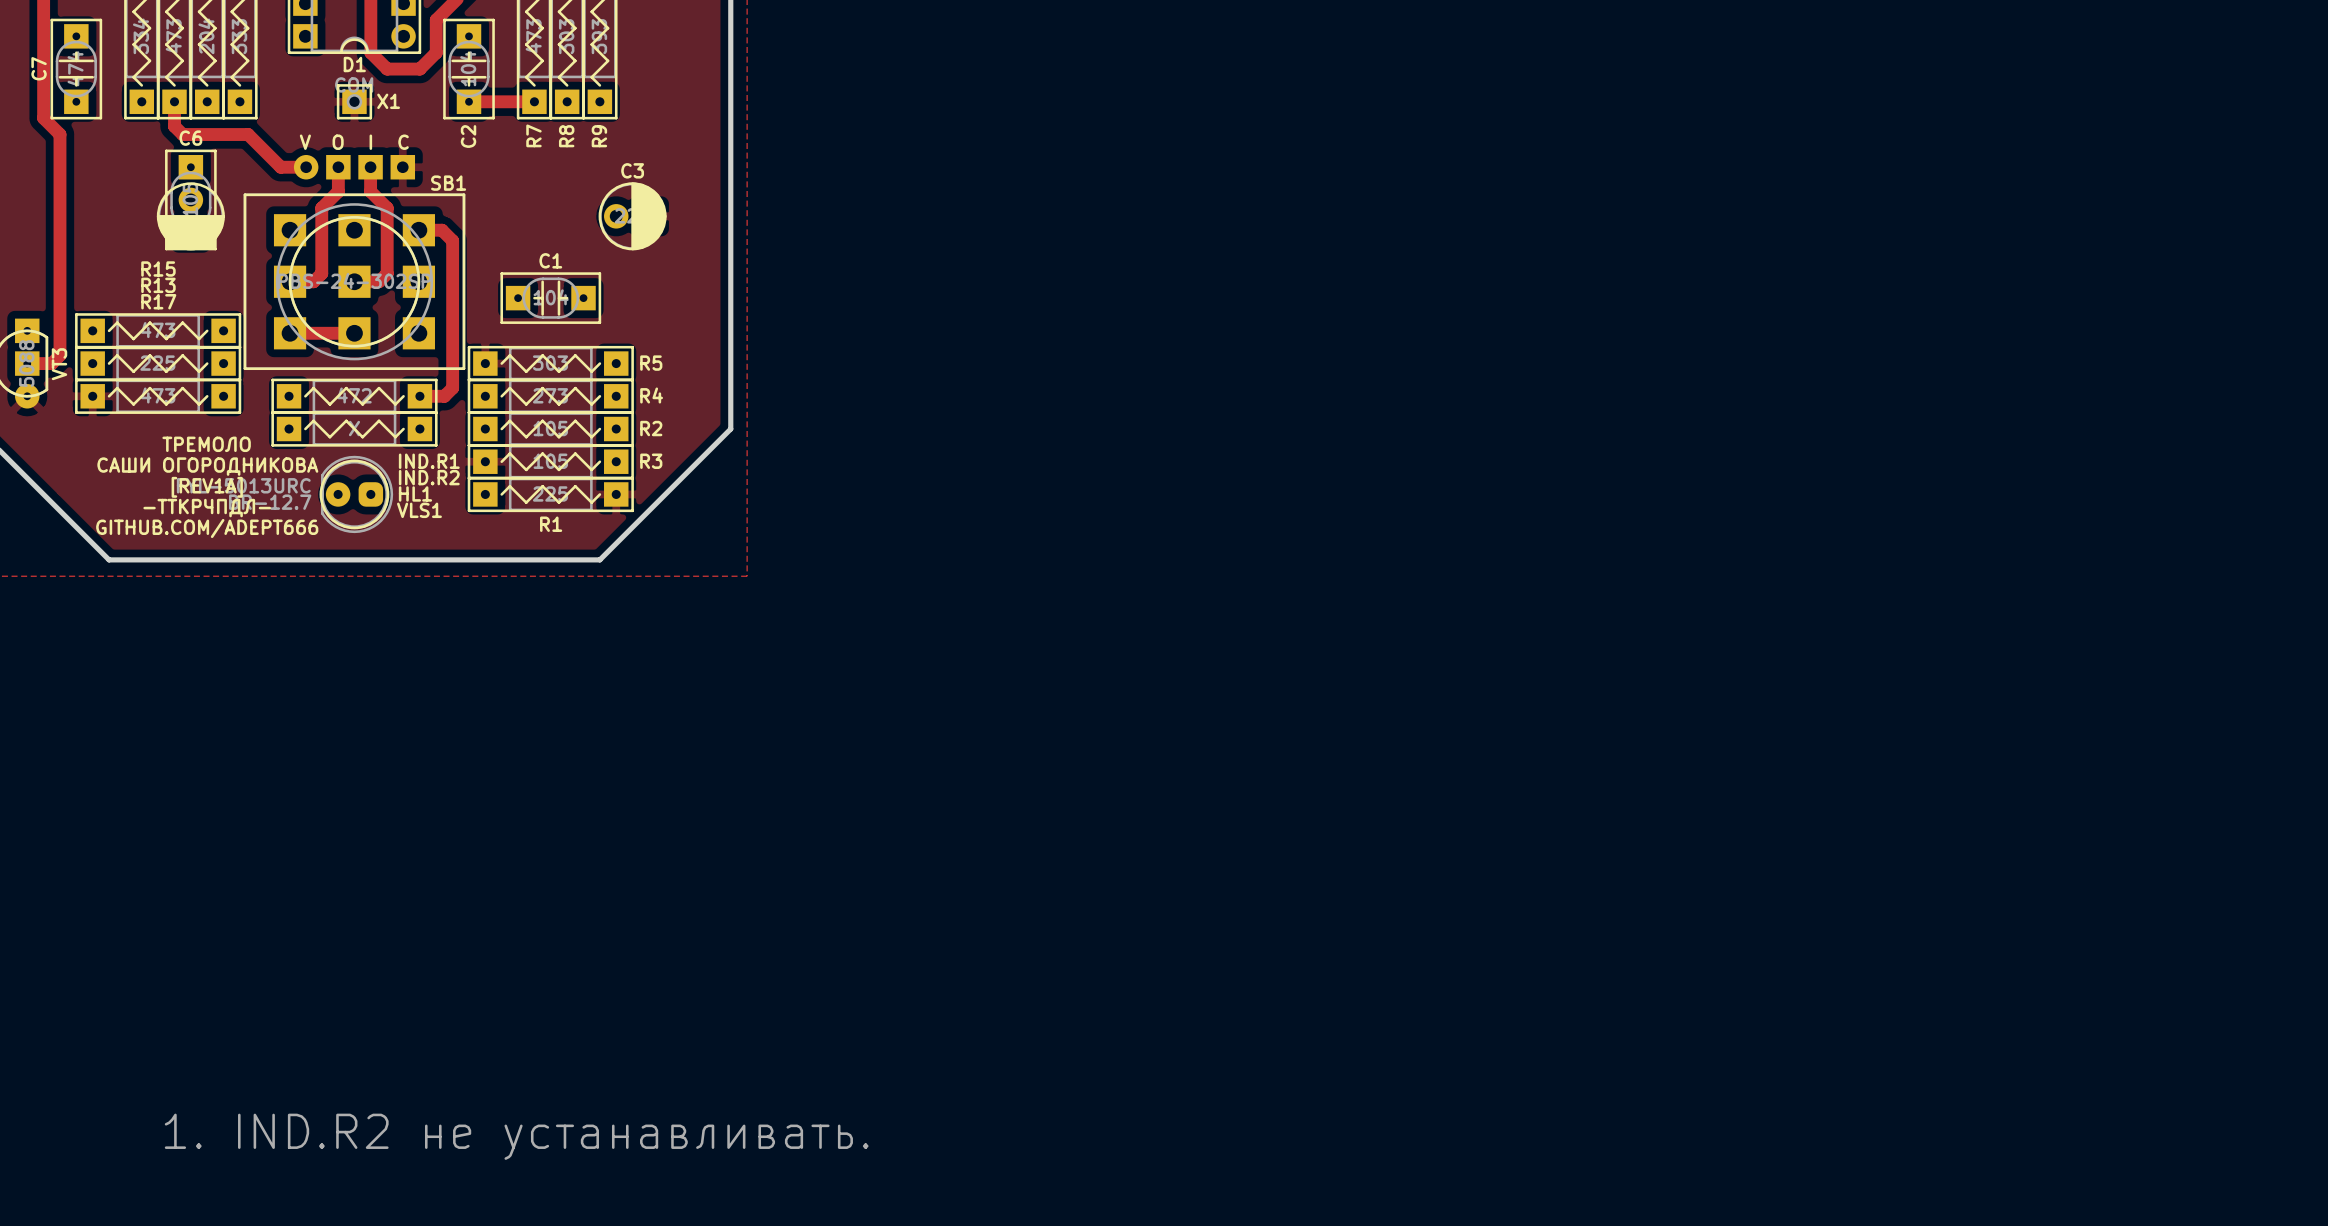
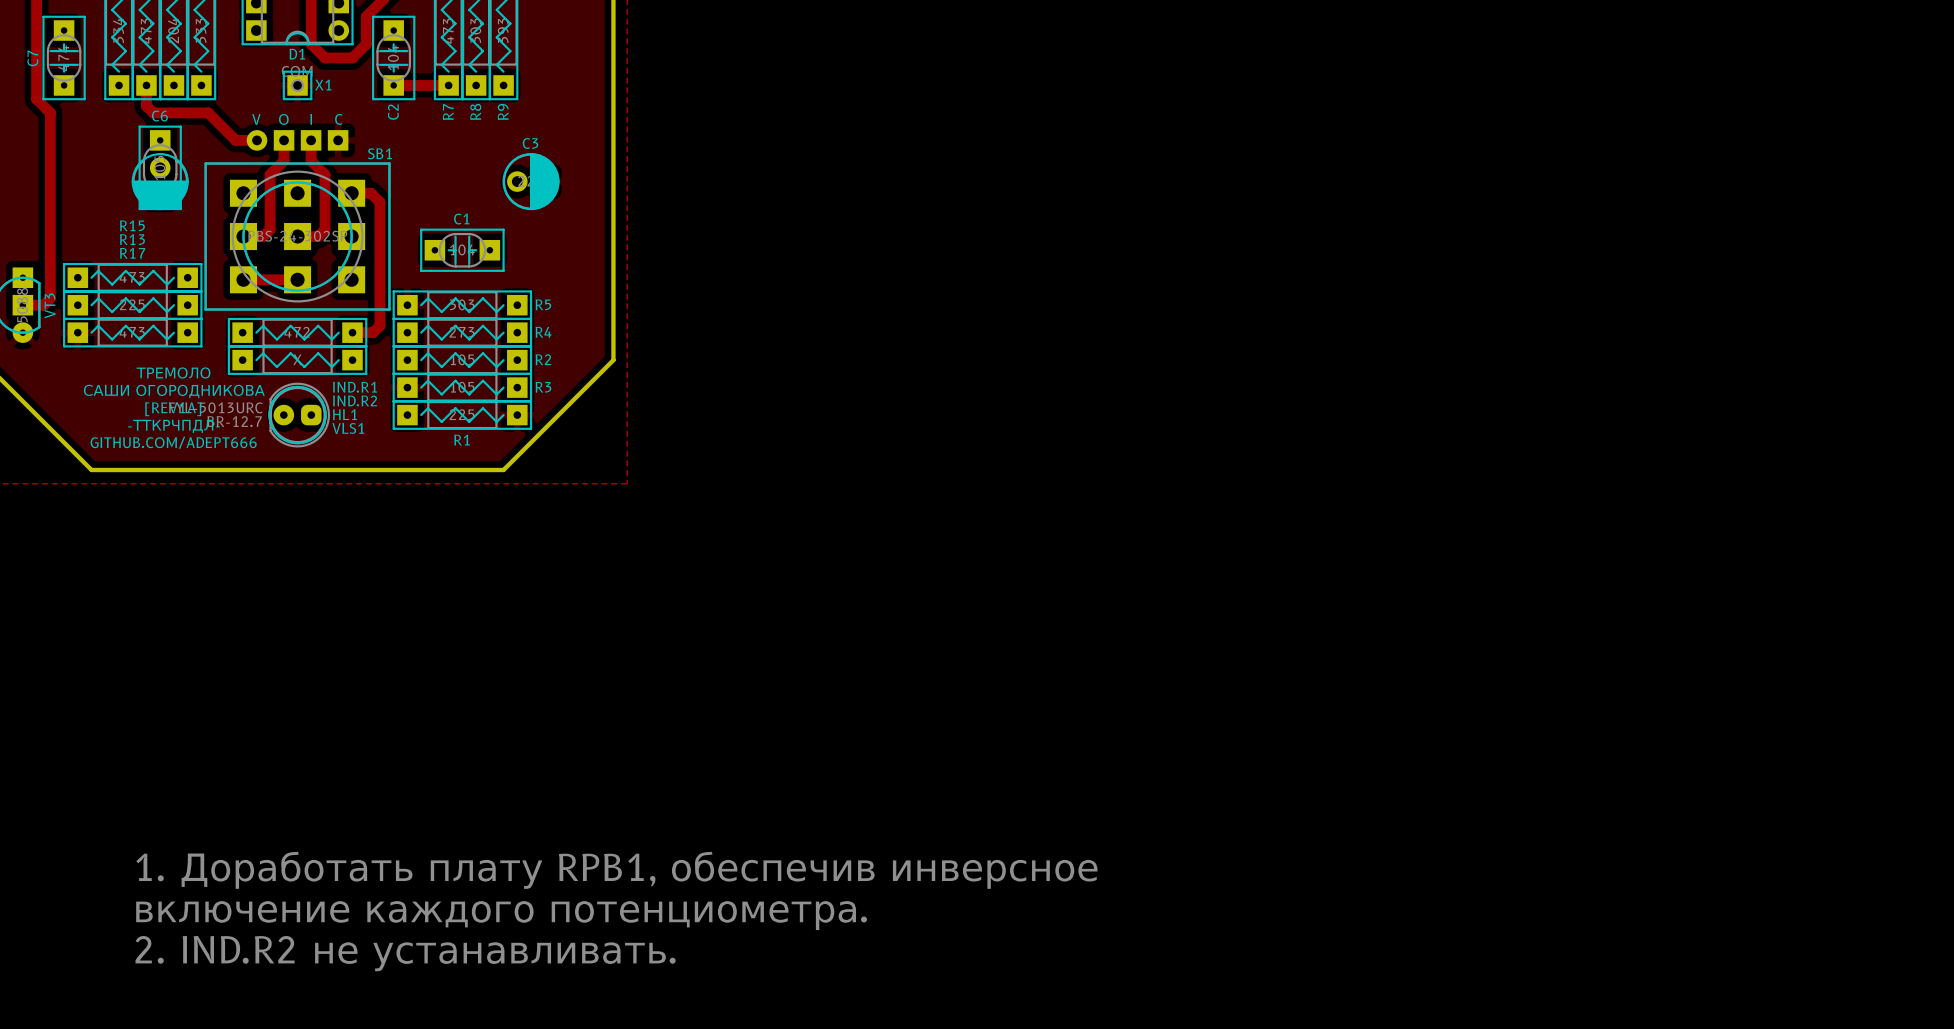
text: none -> 1. Доработать плату RPB1, обеспечив инверсное (616, 870)
text: none -> включение каждого потенциометра. (501, 915)
text: 1. IND.R2 не устанавливать. (516, 1136) -> 2. IND.R2 не устанавливать. (405, 953)

